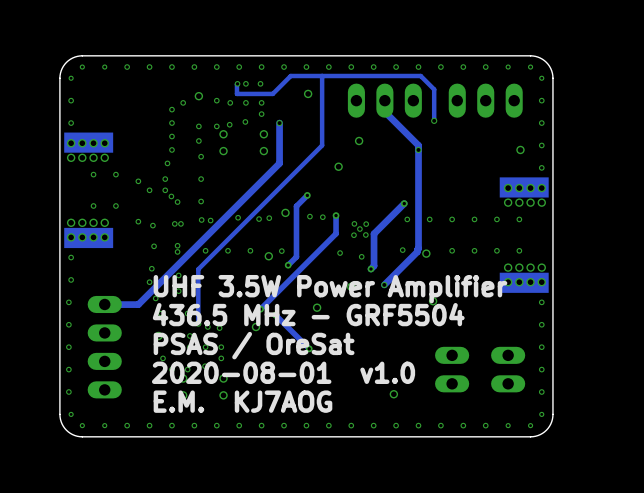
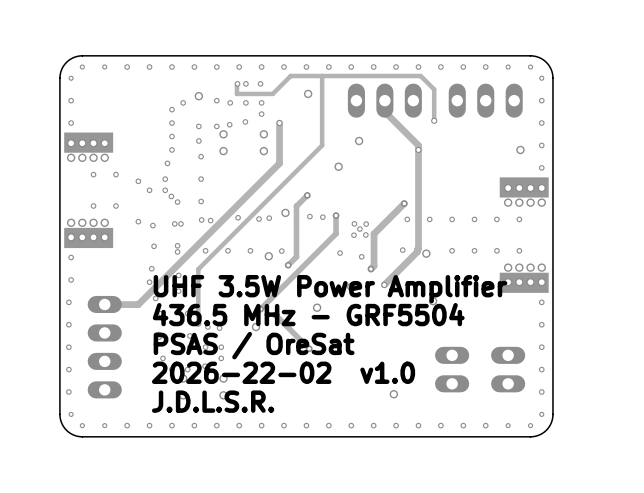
text: 2020-08-01 v1.0 (283, 372) -> 2026-22-02 v1.0 (283, 372)
text: E.M. KJ7AOG (242, 401) -> J.D.L.S.R. (213, 401)

